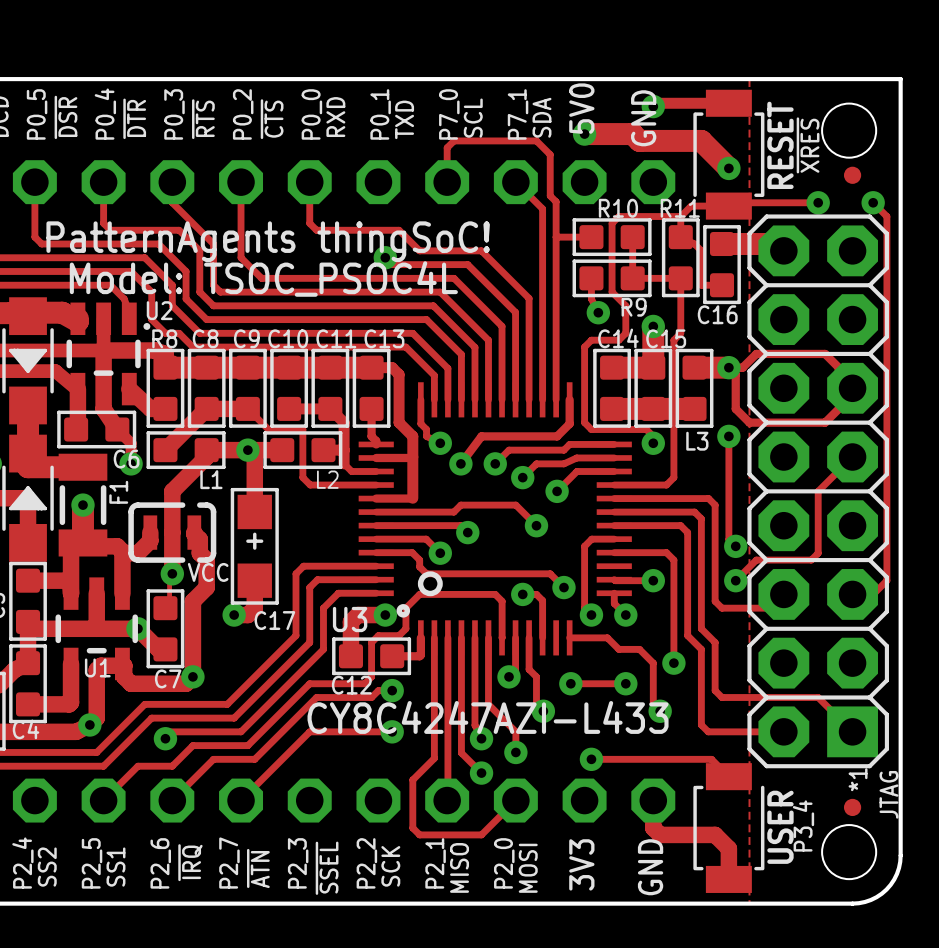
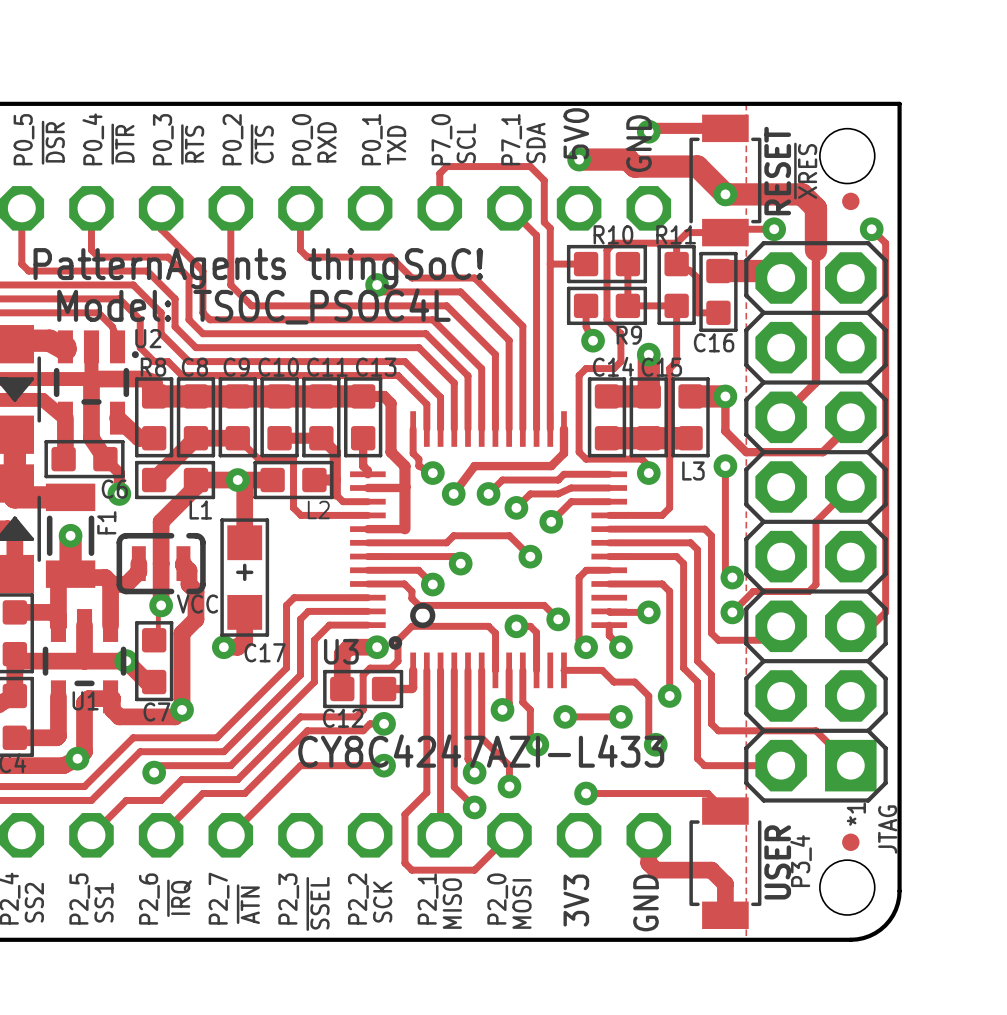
track: none -> (725, 194) (802, 194) (815, 208) (815, 382) (781, 417)
track: (776, 202) (818, 202) -> none
via position: (818, 202) -> (774, 229)
track: (852, 388) (838, 374) (838, 367) (825, 353) (756, 353) (742, 367) (728, 367) (735, 374) (735, 408) -> (725, 396) (725, 431) (732, 438)

